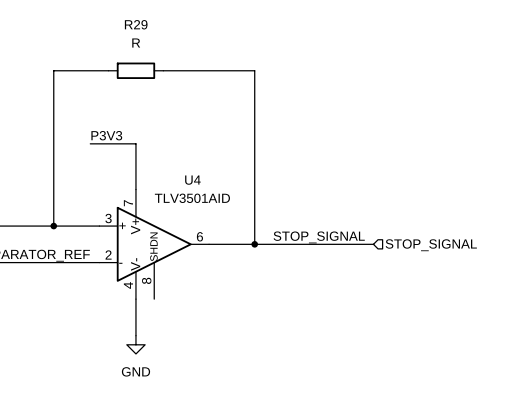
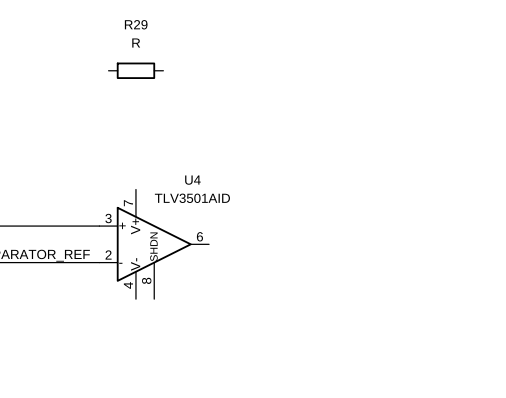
wire: (108, 70) (53, 70) (53, 226) -> none
wire: (163, 70) (254, 70) (254, 244) -> none
label: P3V3 (106, 135) -> none
wire: (90, 143) (135, 143) (135, 189) -> none
junction: (53, 226) -> none
label: STOP_SIGNAL (319, 237) -> none
wire: (209, 244) (373, 244) -> none
junction: (254, 244) -> none
hierarchical label: STOP_SIGNAL (431, 245) -> none
wire: (135, 299) (135, 335) -> none
power symbol: GND (135, 344) -> none

